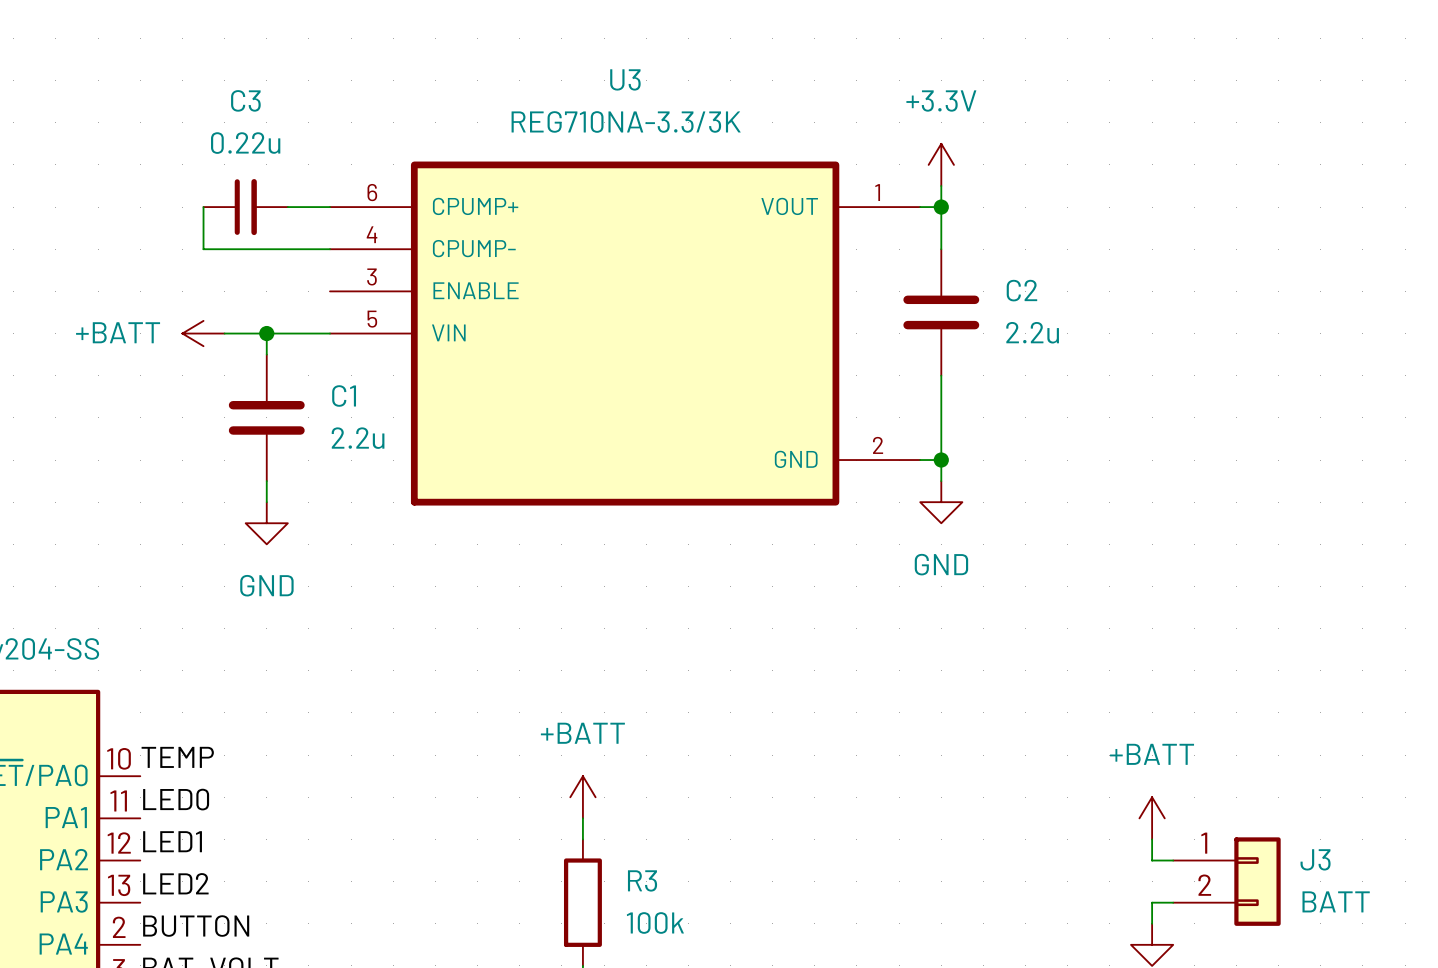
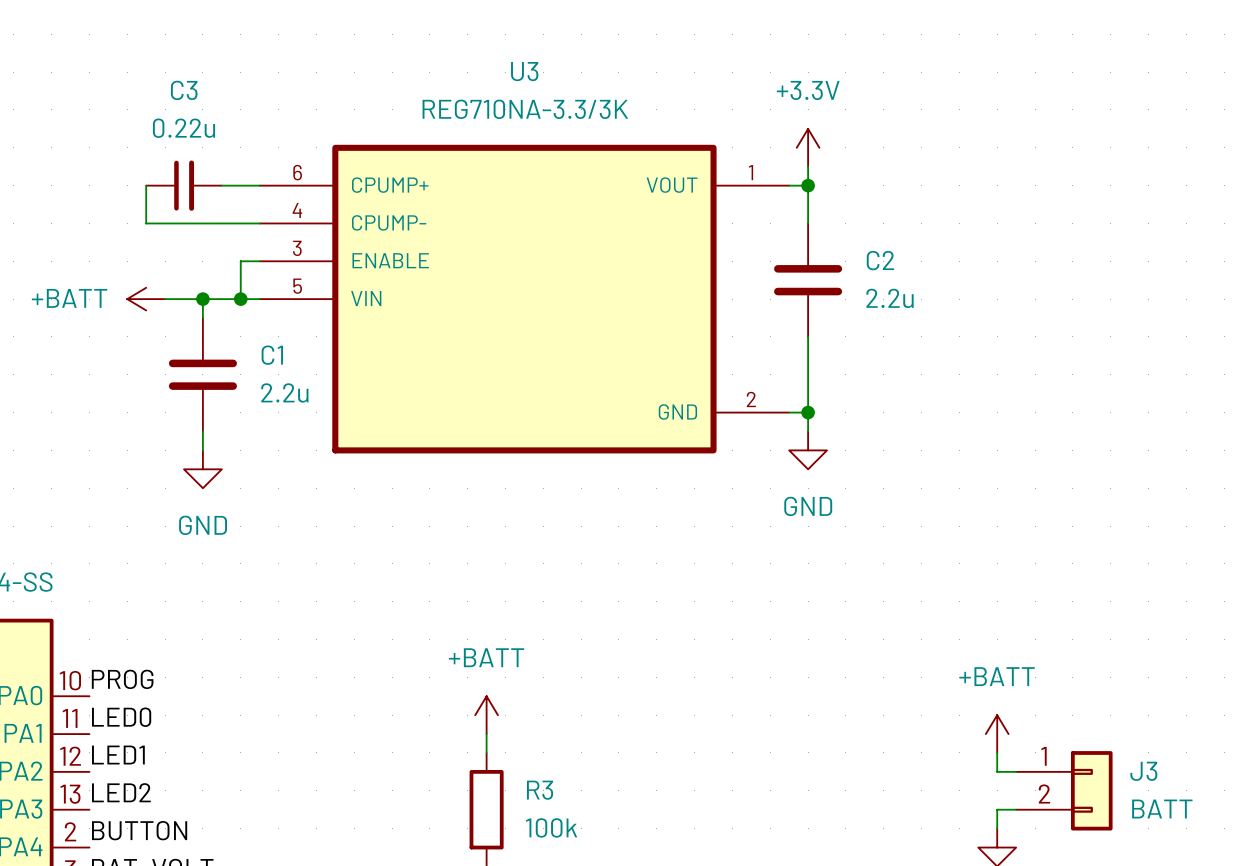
wire: none -> (259, 261) (240, 261) (240, 299)
junction: none -> (240, 299)
label: TEMP (177, 757) -> PROG (122, 679)

